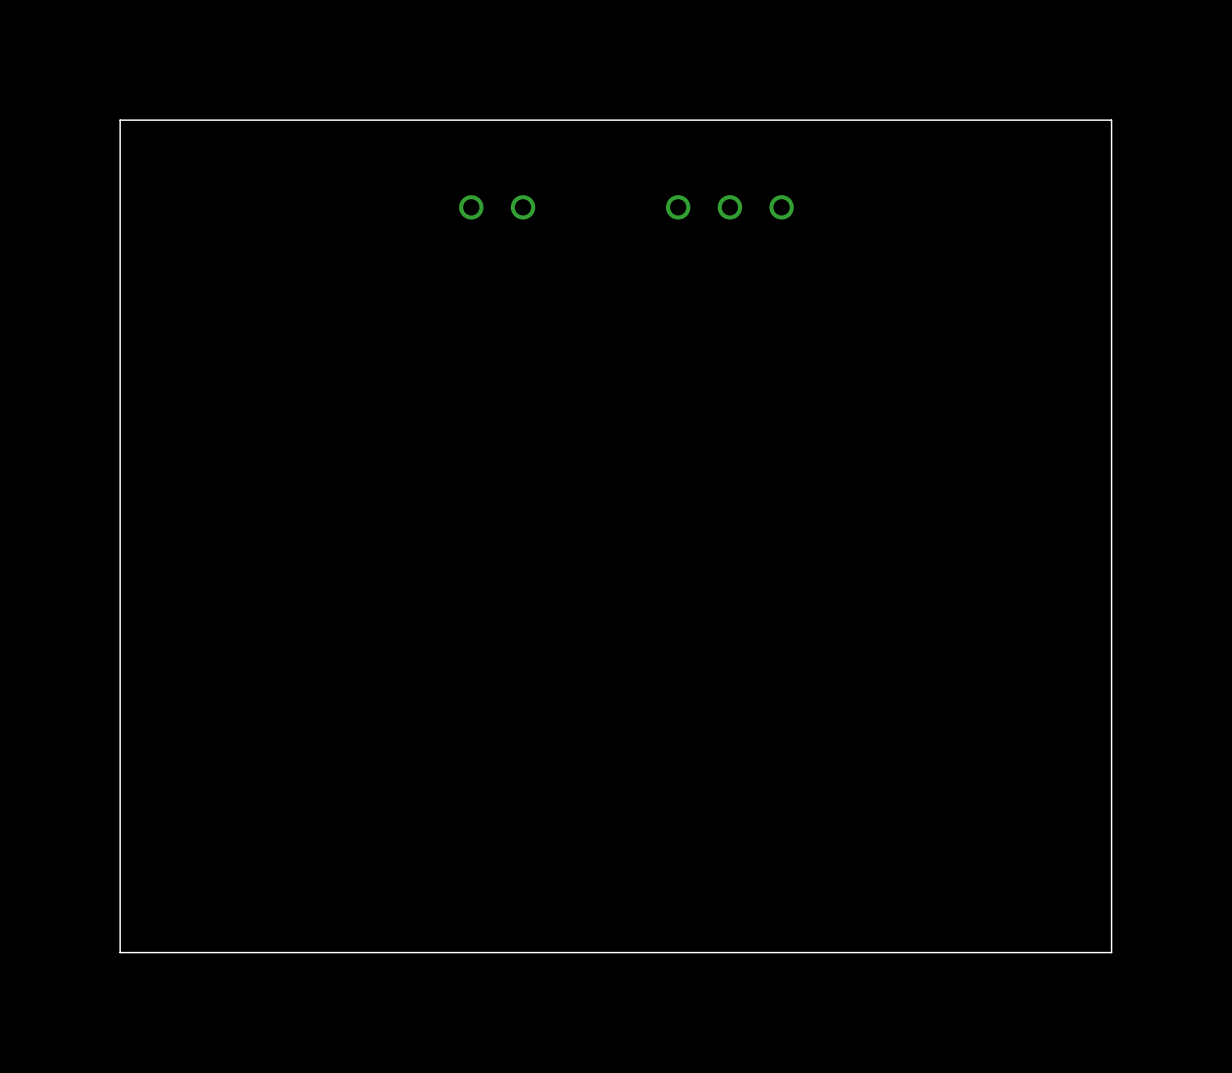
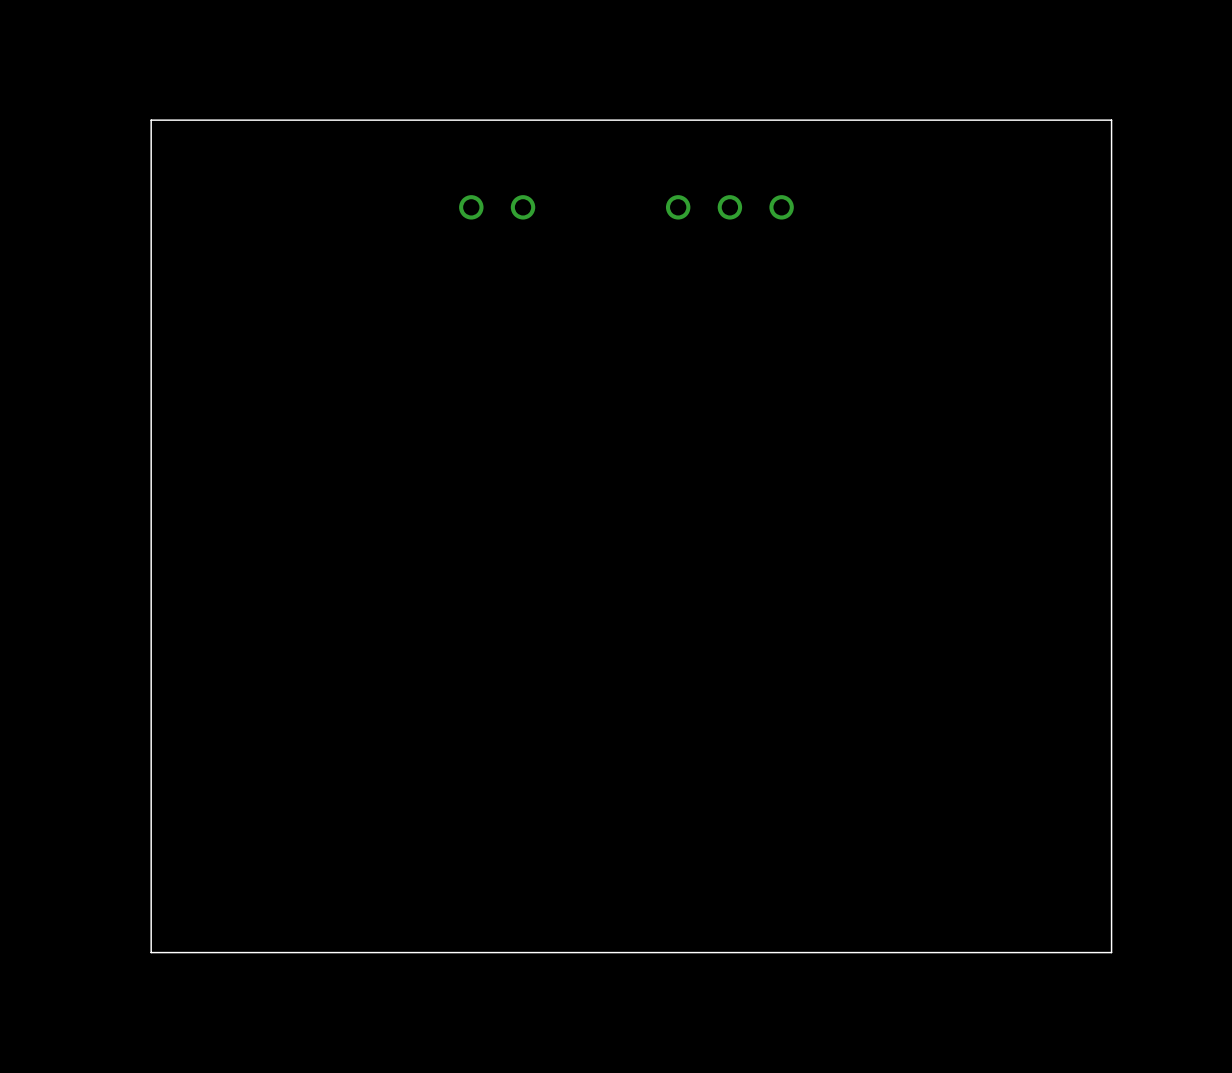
board edge: (151, 120) (120, 120) (120, 952) (151, 952) -> (151, 120) (151, 952)

